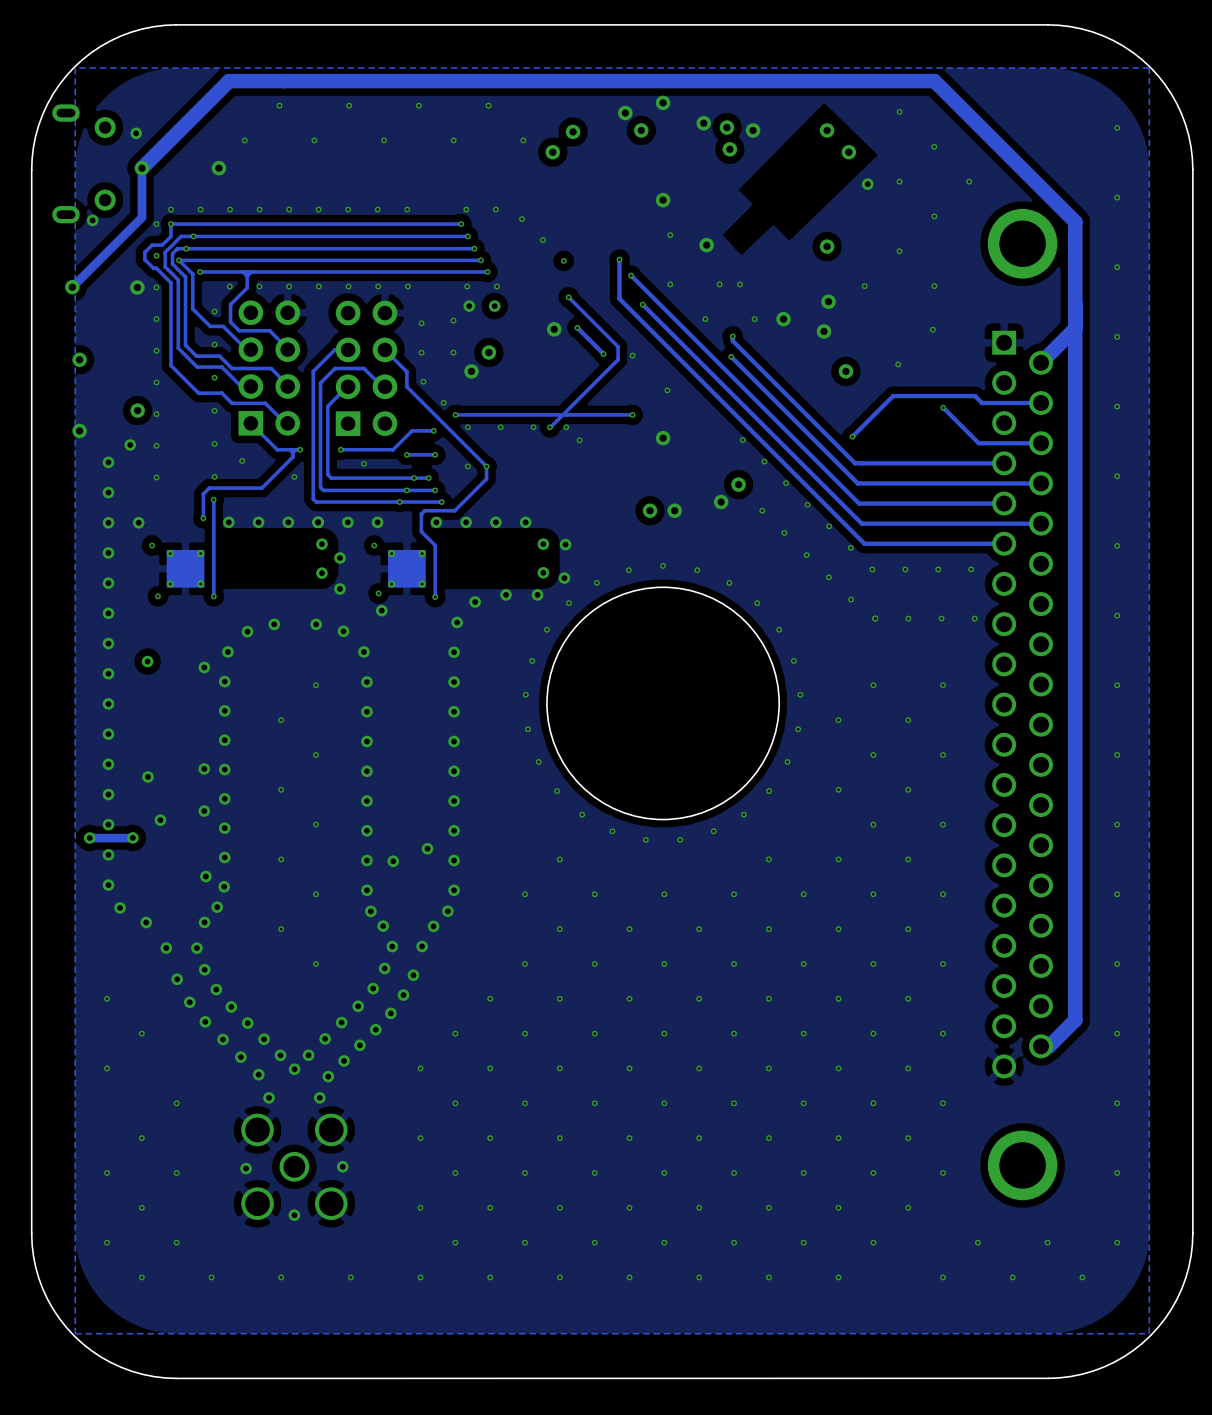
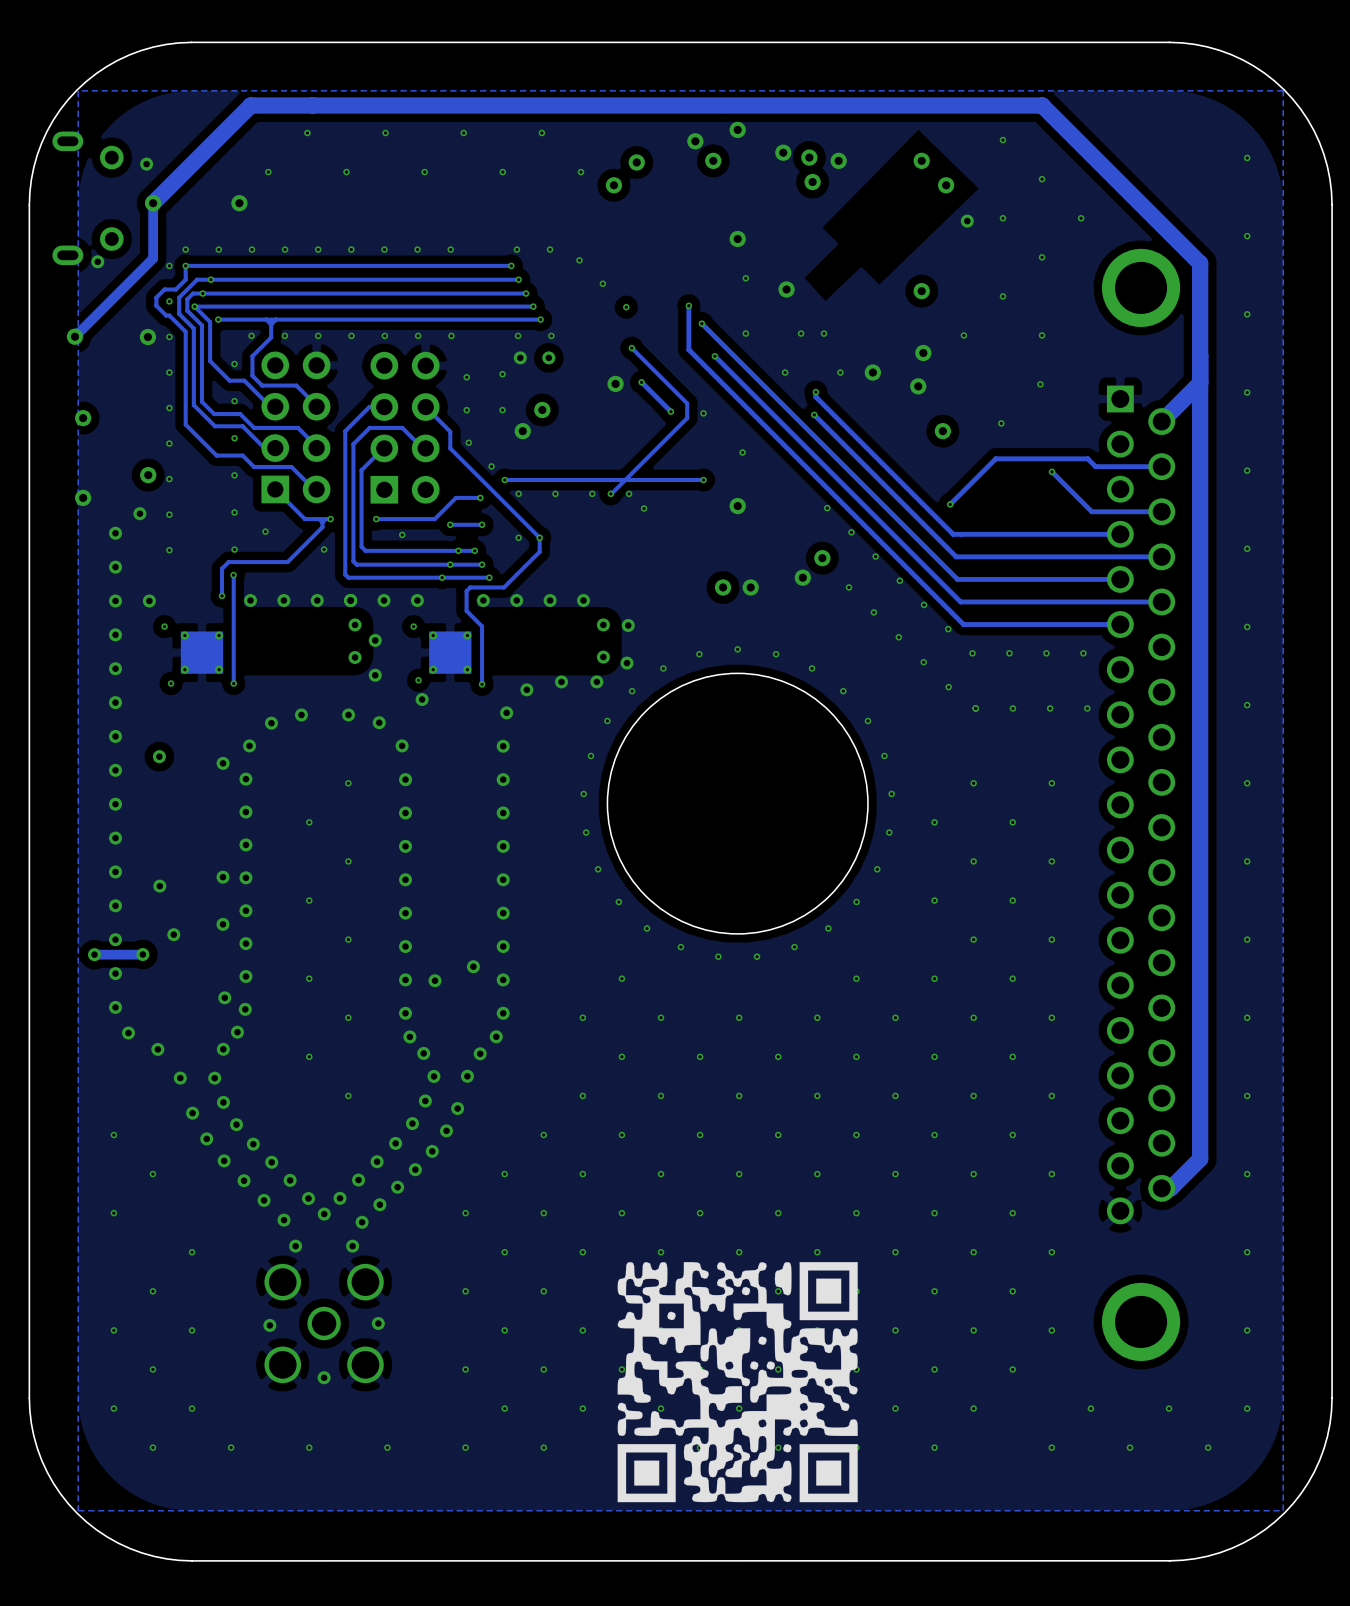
drawing: none -> [617, 1262, 858, 1503]

